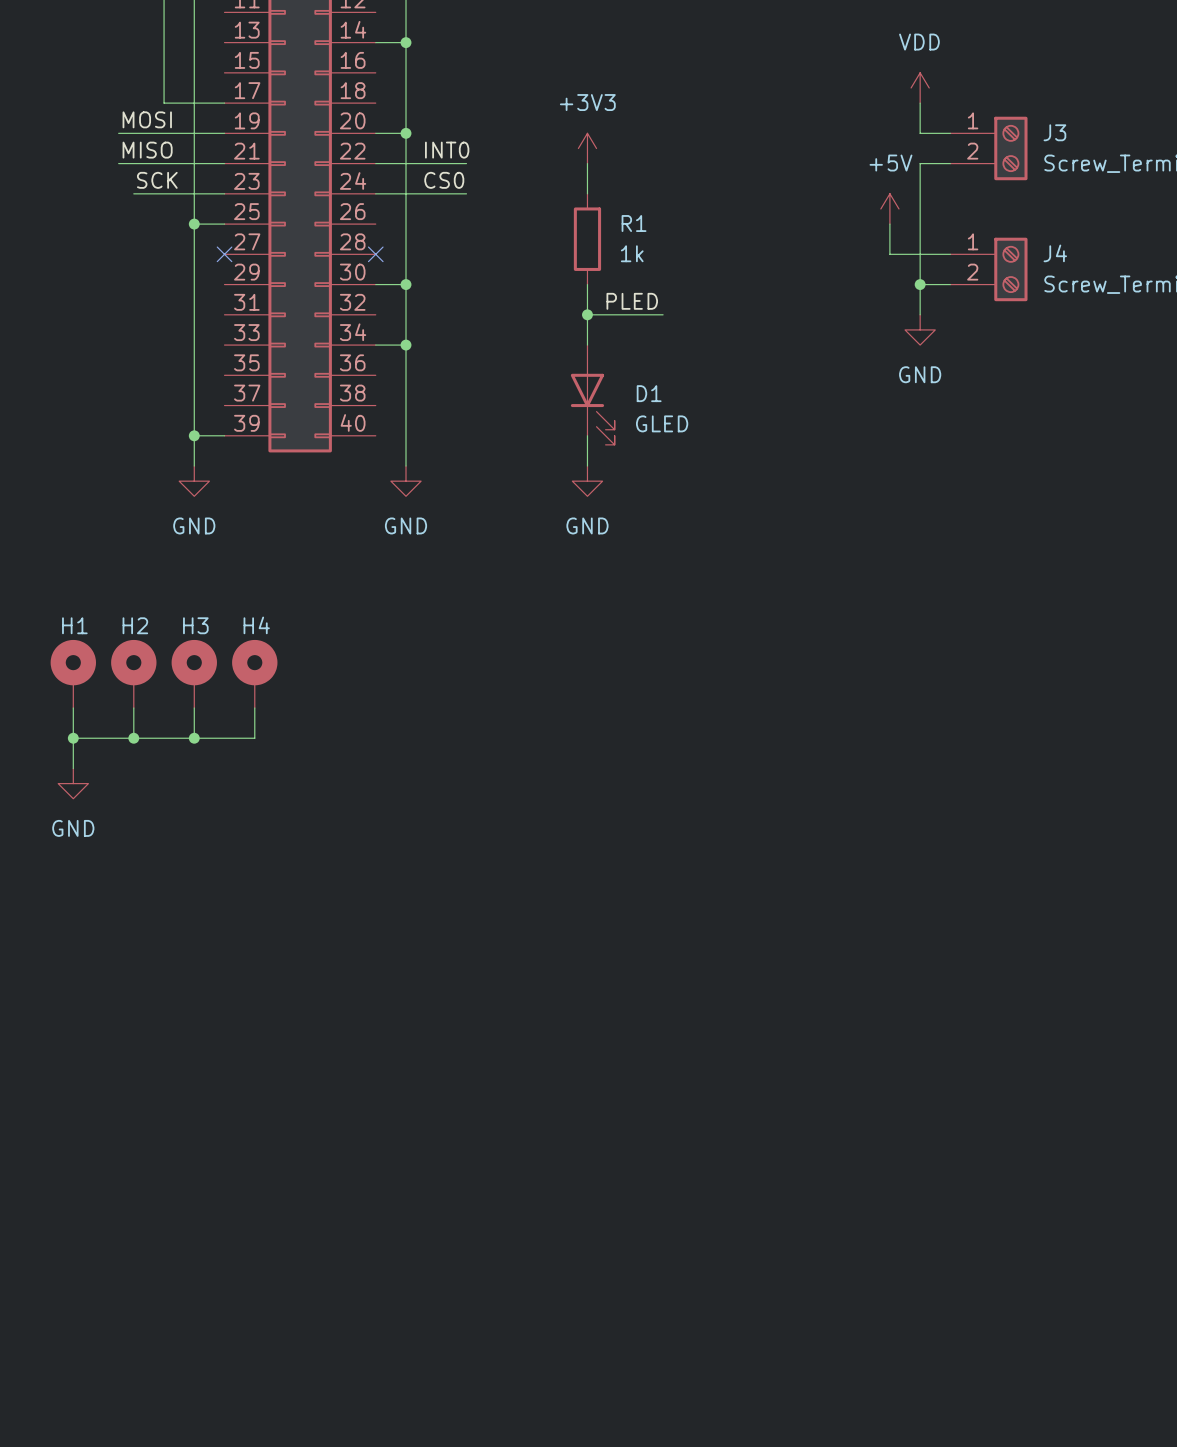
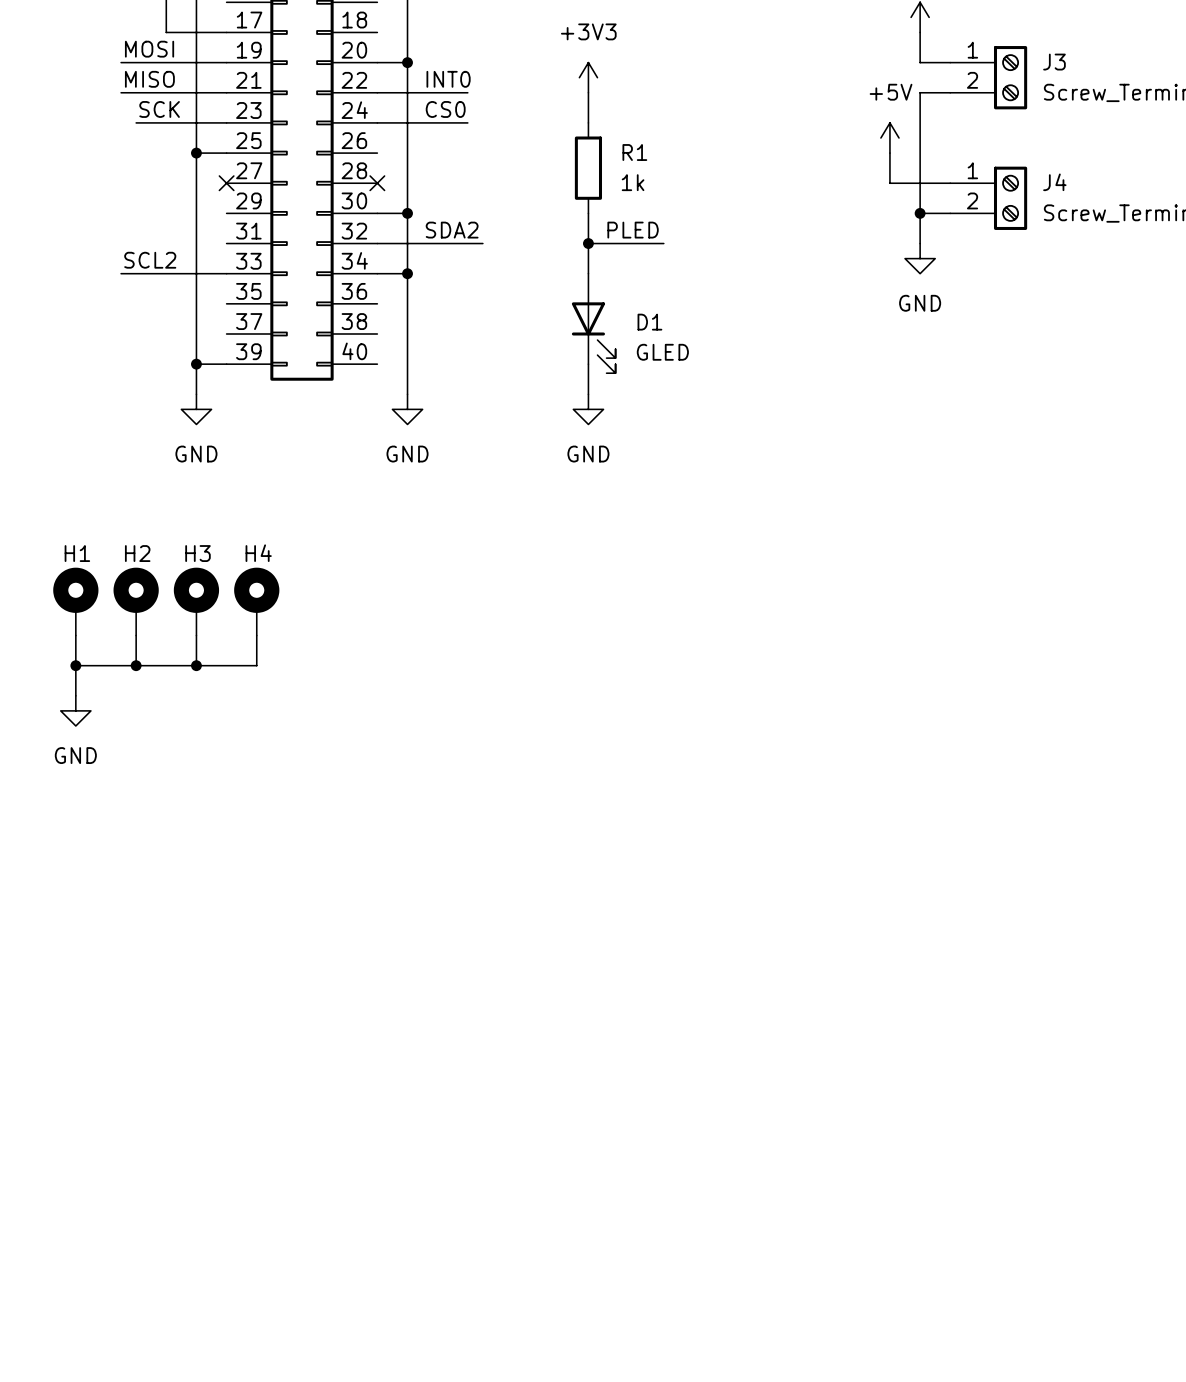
label: none -> SDA2 (452, 230)
wire: none -> (377, 243) (482, 243)
label: none -> SCL2 (150, 260)
wire: none -> (121, 273) (226, 273)

